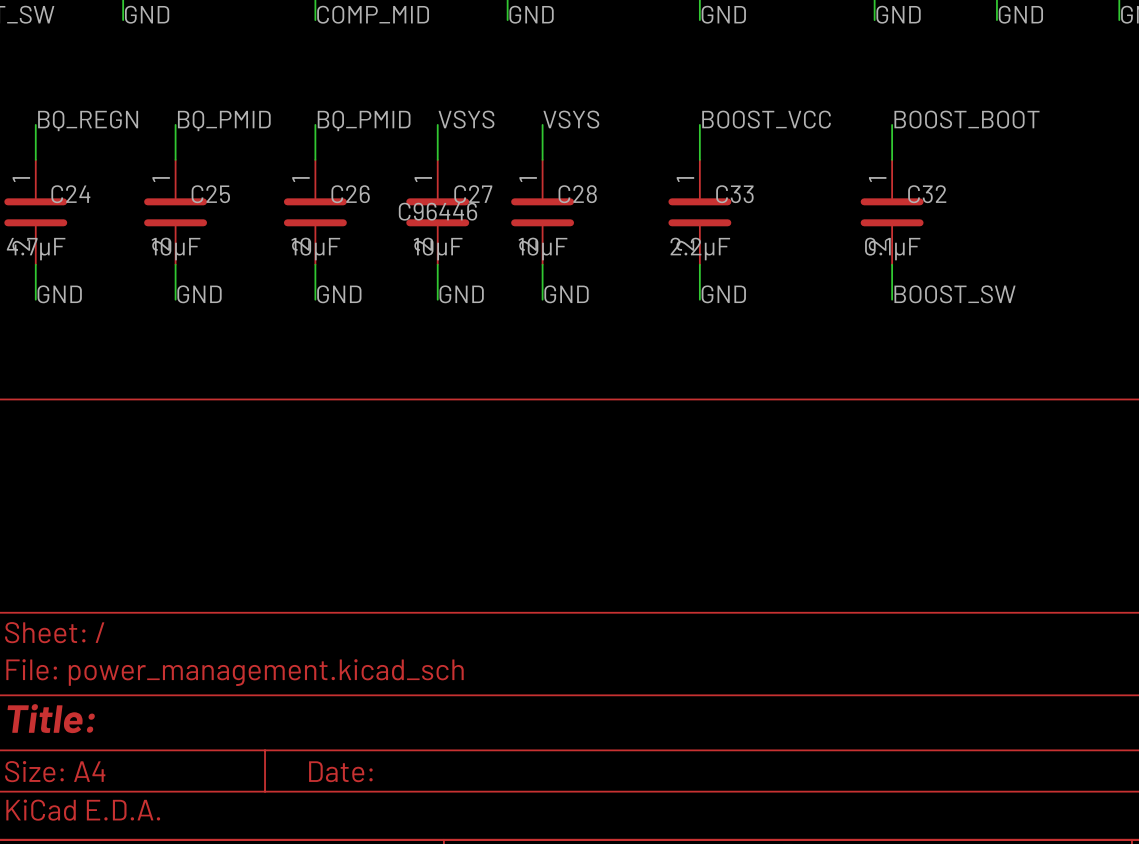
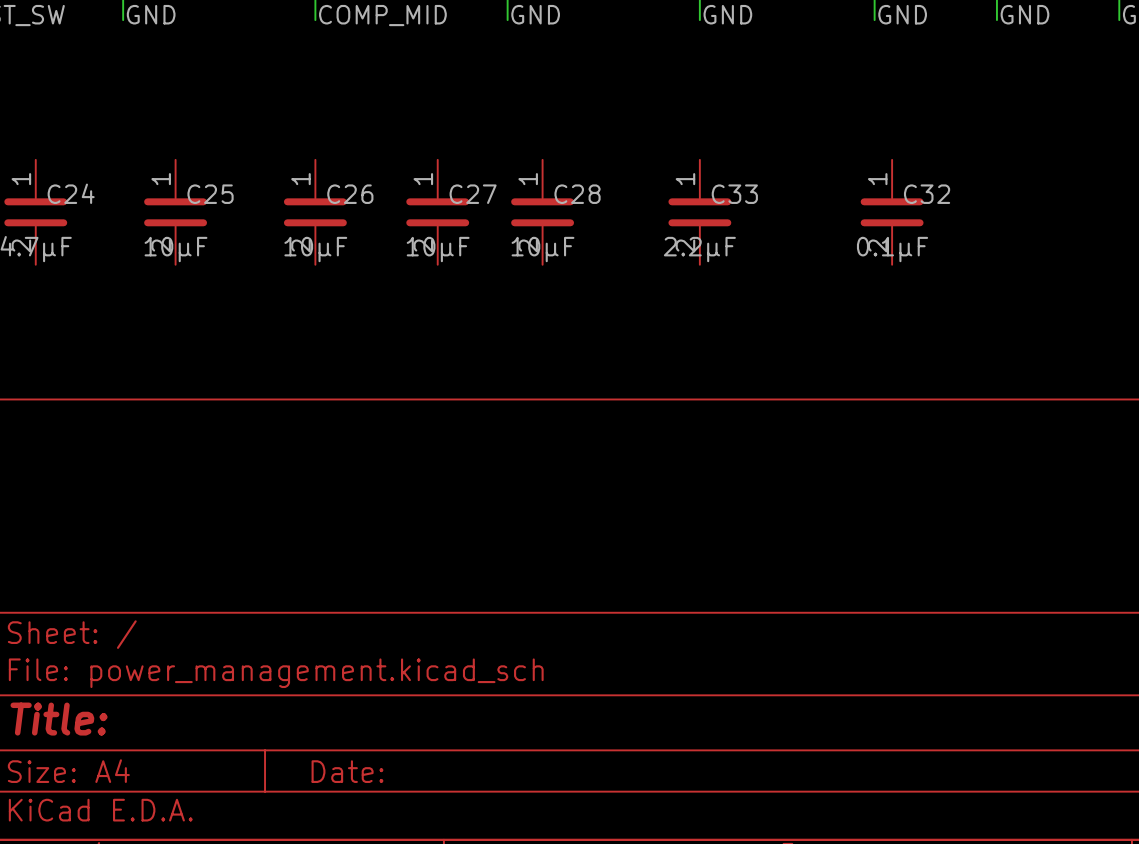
label: VSYS (466, 119) -> none
label: VSYS (571, 119) -> none
label: BOOST_VCC (766, 119) -> none
label: BOOST_BOOT (966, 119) -> none
label: BQ_REGN (88, 120) -> none
label: BQ_PMID (224, 120) -> none
label: BQ_PMID (364, 120) -> none
wire: (35, 124) (35, 159) -> none
wire: (175, 124) (175, 159) -> none
wire: (315, 124) (315, 159) -> none
wire: (437, 124) (437, 159) -> none
wire: (542, 124) (542, 159) -> none
wire: (699, 124) (699, 159) -> none
wire: (892, 124) (892, 159) -> none
C27 text: C96446 (438, 211) -> none
wire: (35, 264) (35, 299) -> none
wire: (175, 264) (175, 299) -> none
wire: (315, 264) (315, 299) -> none
wire: (437, 264) (437, 299) -> none
wire: (542, 264) (542, 299) -> none
wire: (699, 264) (699, 299) -> none
wire: (892, 264) (892, 299) -> none
label: GND (59, 294) -> none
label: GND (199, 294) -> none
label: GND (339, 294) -> none
label: GND (461, 294) -> none
label: GND (566, 294) -> none
label: GND (723, 294) -> none
label: BOOST_SW (954, 294) -> none

